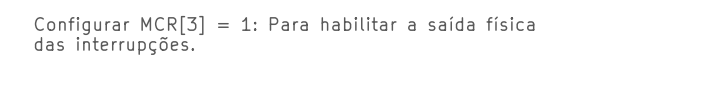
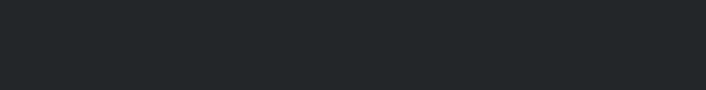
text: Configurar MCR[3] = 1: Para habilitar a saída física (284, 25) -> none
text: das interrupções. (114, 45) -> none

